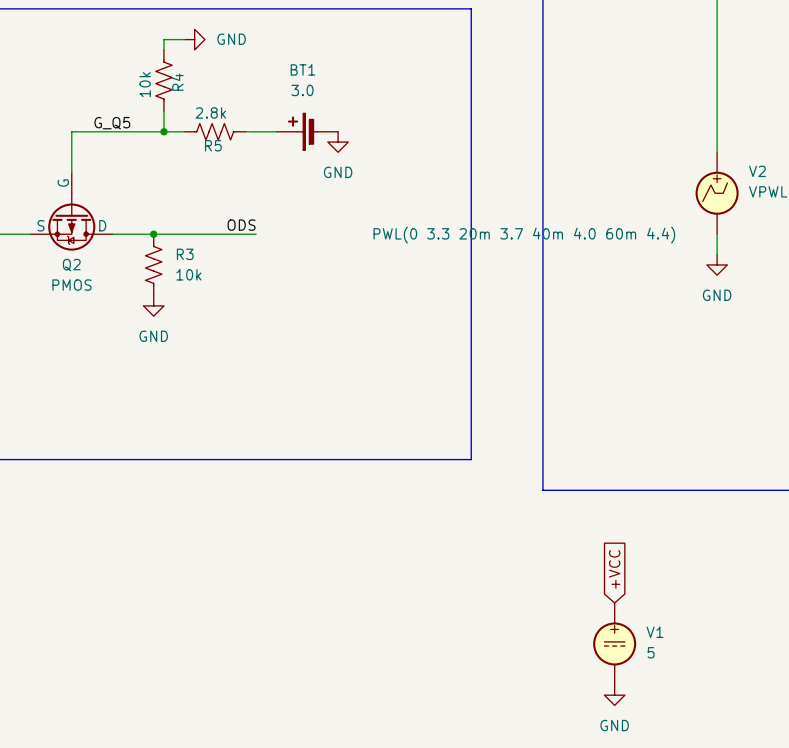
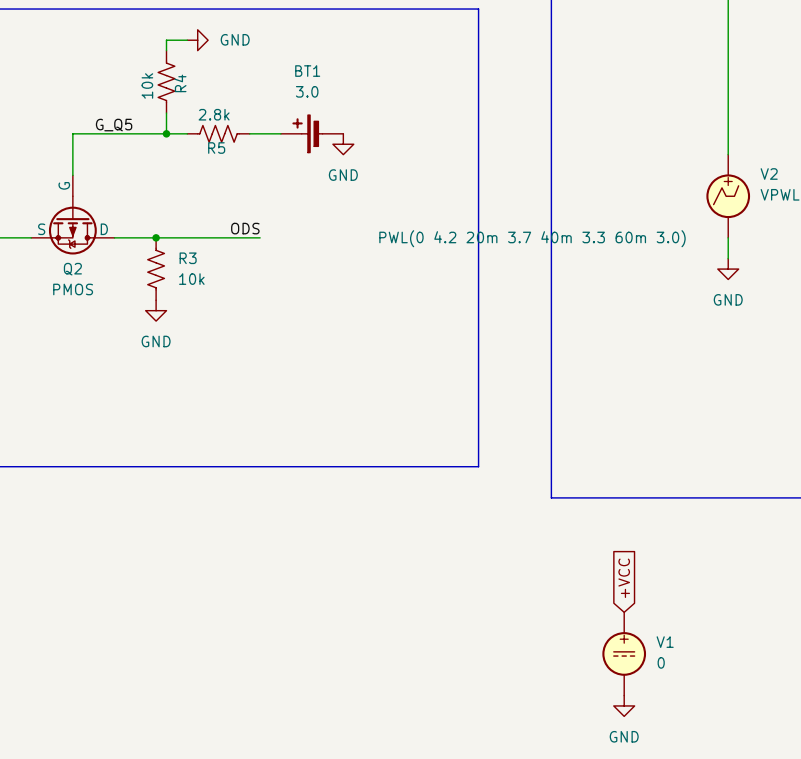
V2 text: PWL(0 3.3 20m 3.7 40m 4.0 60m 4.4) (524, 235) -> PWL(0 4.2 20m 3.7 40m 3.3 60m 3.0) (532, 238)
V1 value: 5 (651, 652) -> 0 (661, 662)

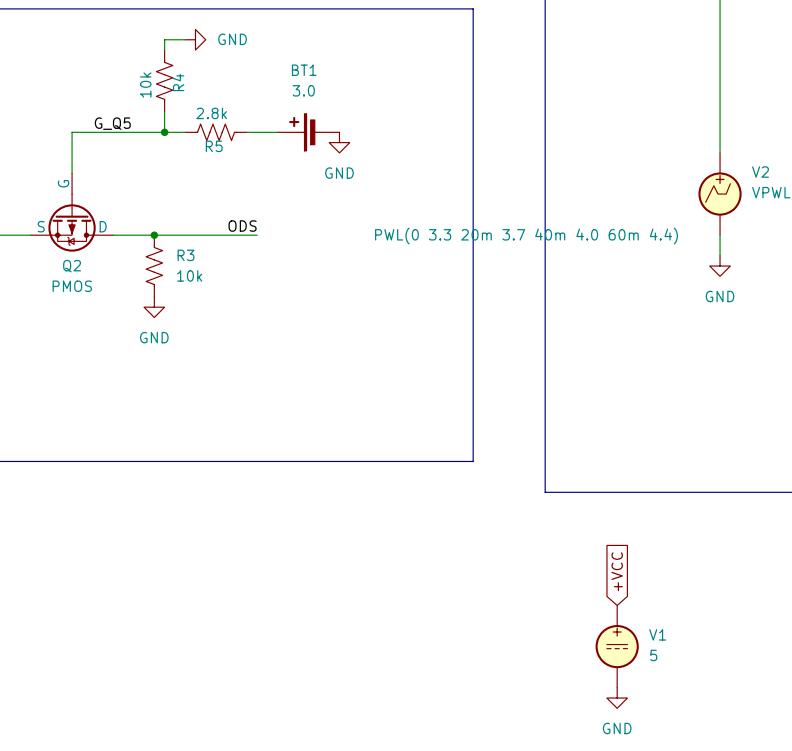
V2 text: PWL(0 4.2 20m 3.7 40m 3.3 60m 3.0) (532, 238) -> PWL(0 3.3 20m 3.7 40m 4.0 60m 4.4) (526, 236)
V1 value: 0 (661, 662) -> 5 (653, 655)

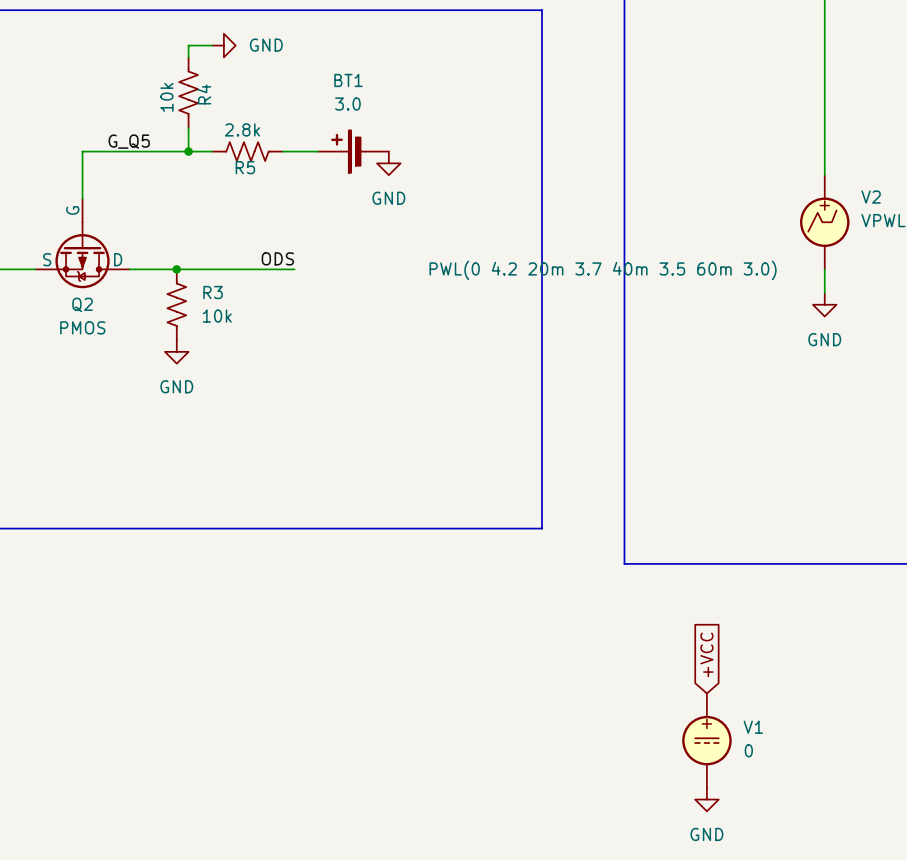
V2 text: PWL(0 3.3 20m 3.7 40m 4.0 60m 4.4) (526, 236) -> PWL(0 4.2 20m 3.7 40m 3.5 60m 3.0) (603, 270)
V1 value: 5 (653, 655) -> 0 (748, 750)

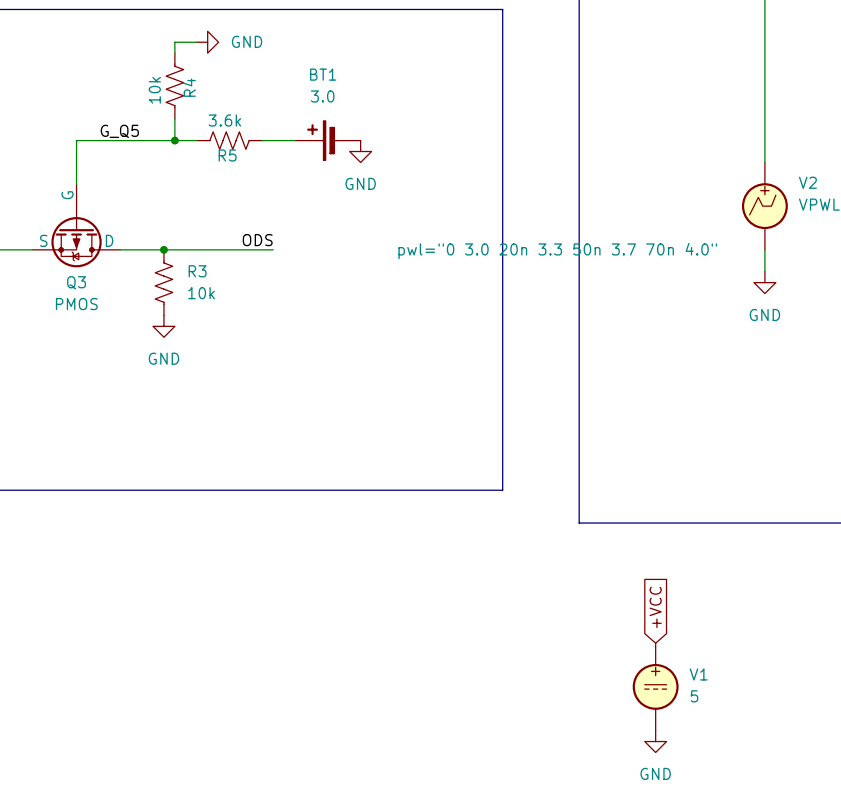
R5 value: 2.8k (242, 129) -> 3.6k (224, 120)
V2 text: PWL(0 4.2 20m 3.7 40m 3.5 60m 3.0) (603, 270) -> pwl="0 3.0 20n 3.3 50n 3.7 70n 4.0" (557, 251)
Q2 name: Q2 (82, 304) -> Q3 (76, 282)
V1 value: 0 (748, 750) -> 5 (694, 696)

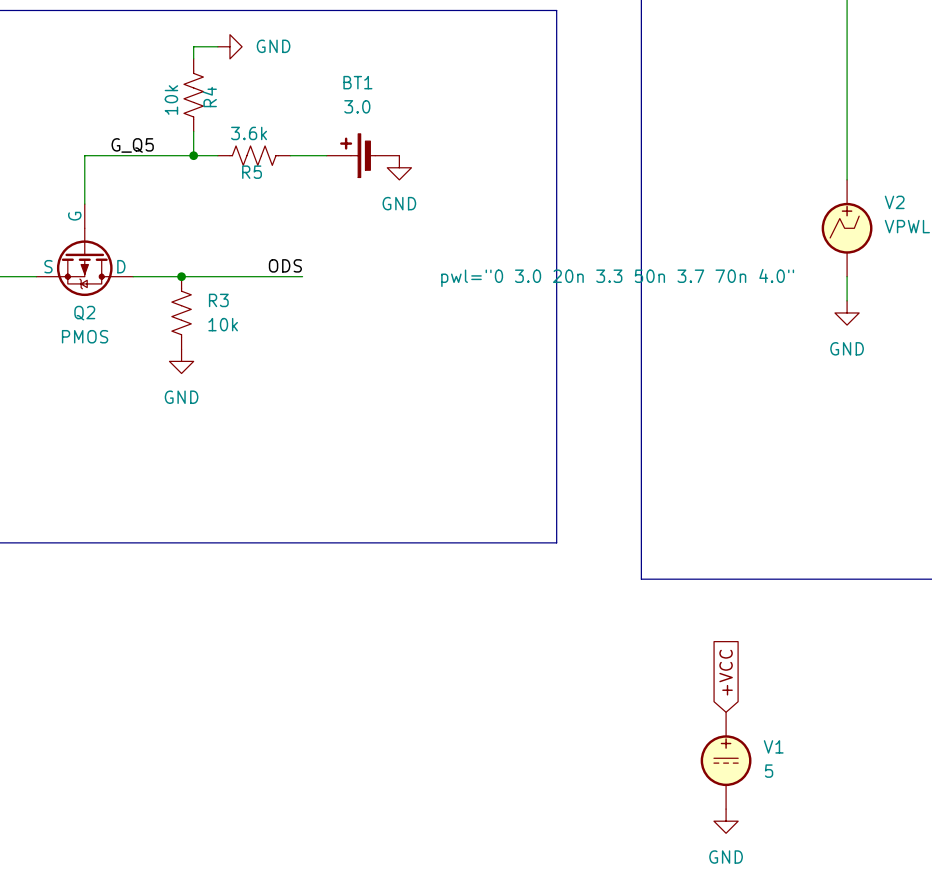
Q3 name: Q3 (76, 282) -> Q2 (84, 313)

